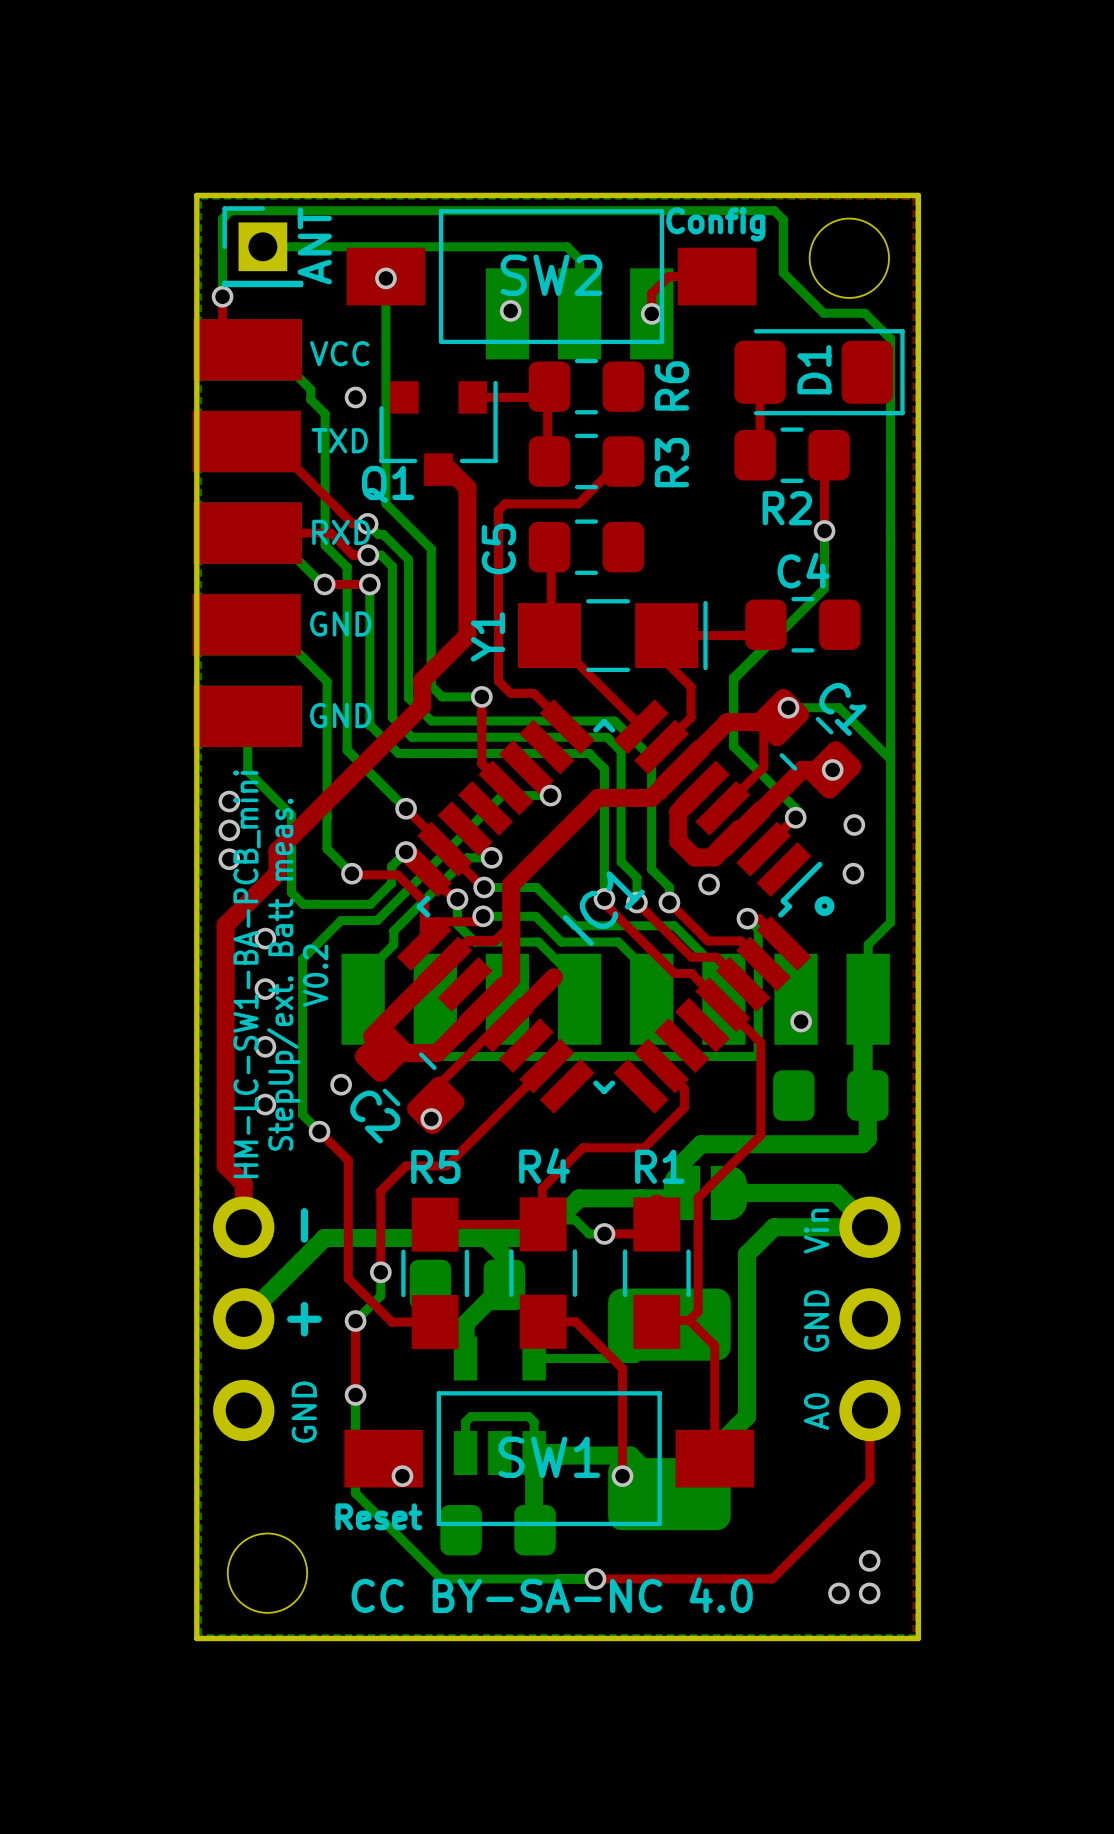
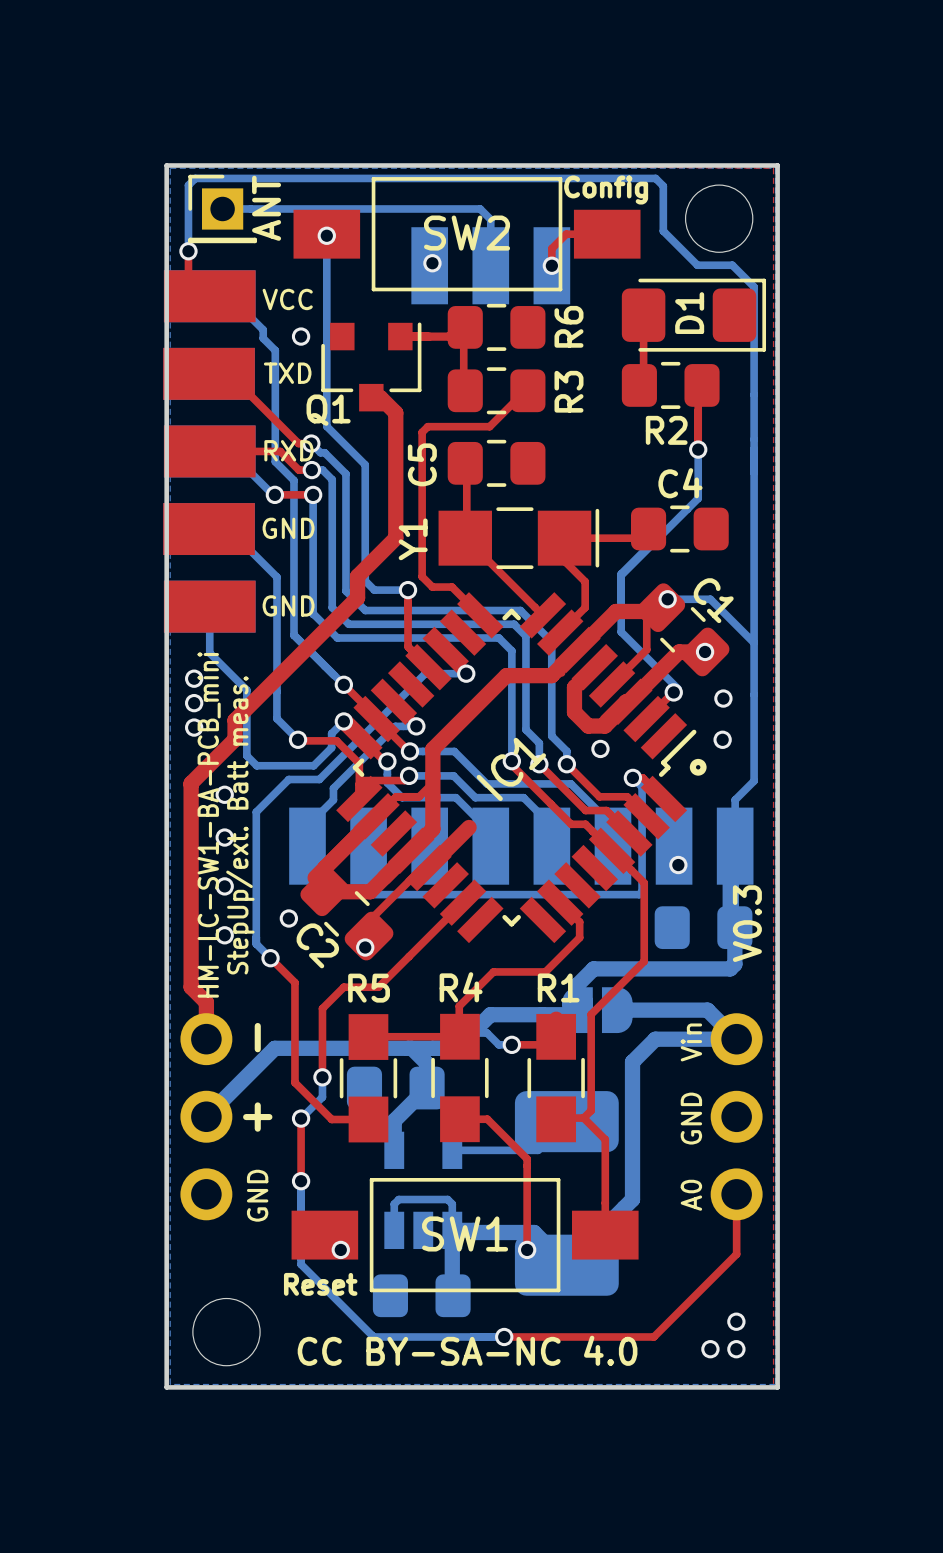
text: V0.2 (315, 975) -> none
text: none -> V0.3 (747, 923)

